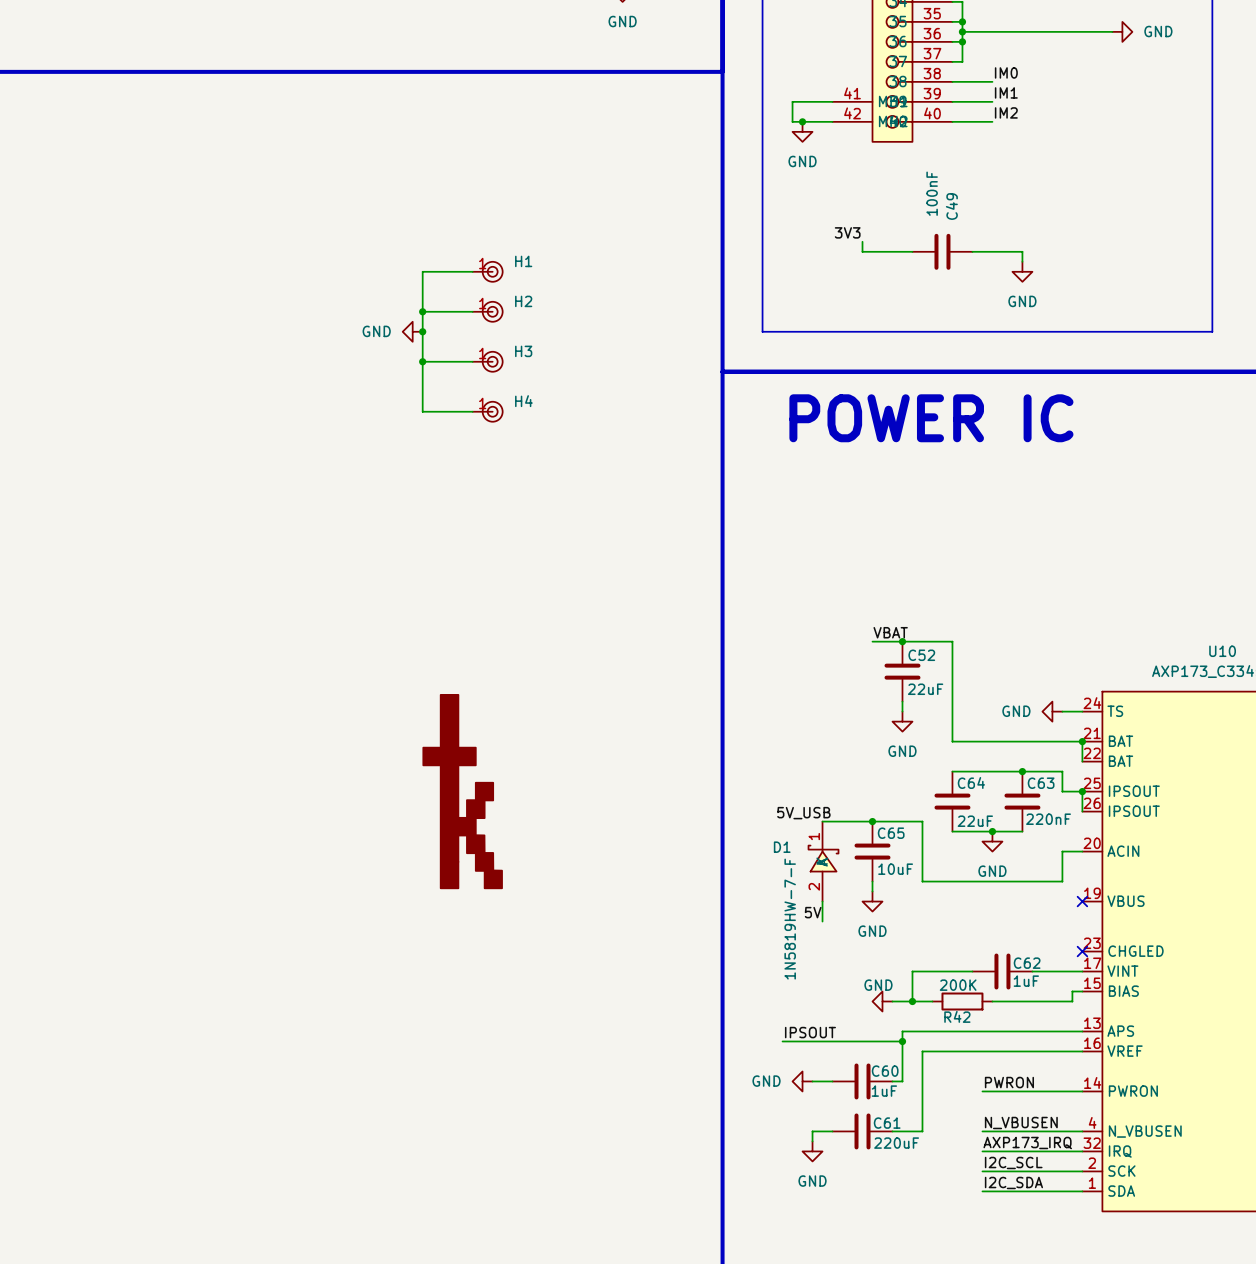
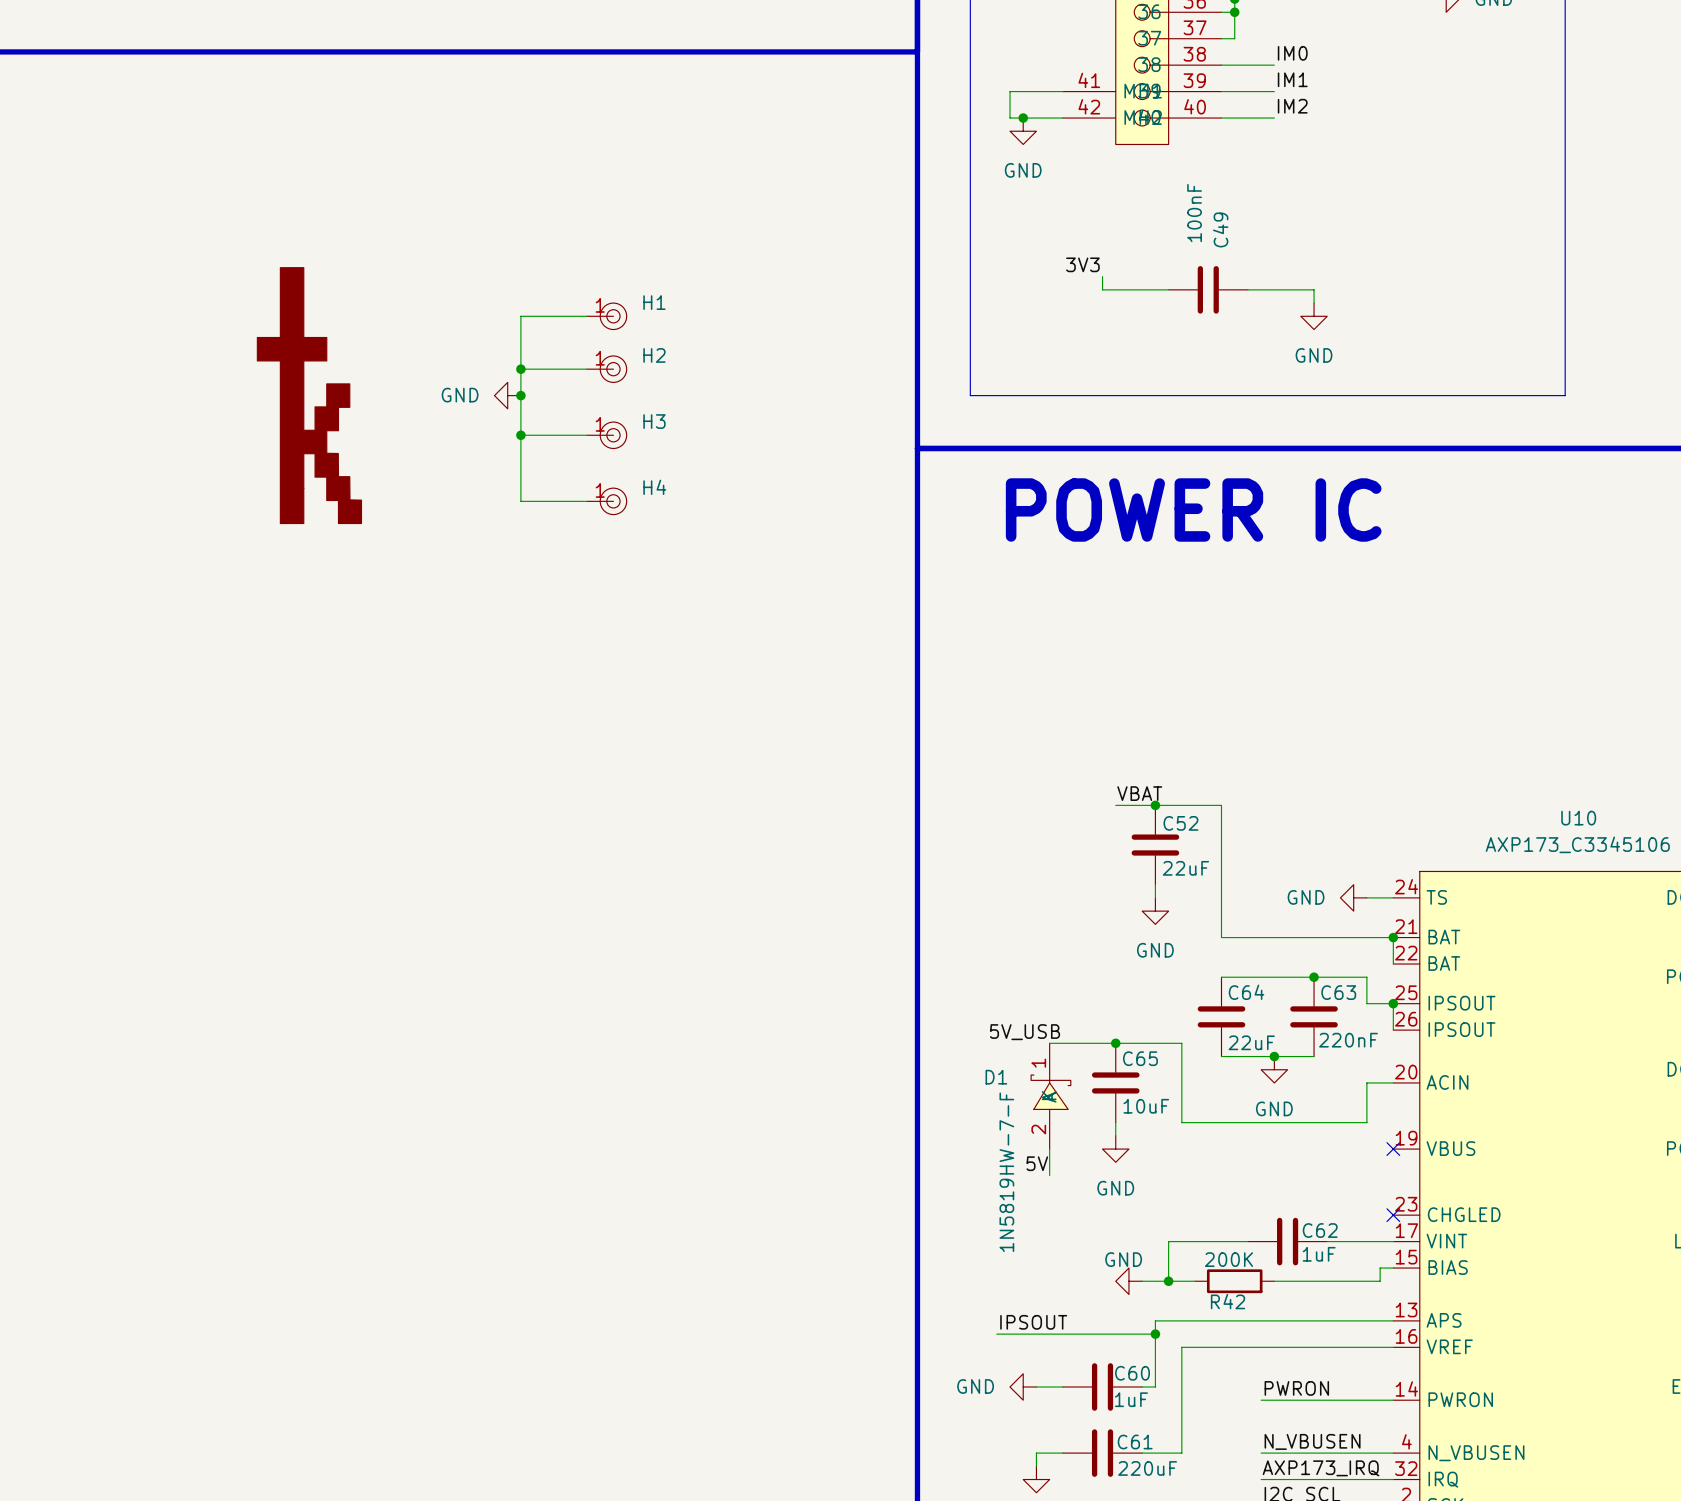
power symbol: none -> (309, 395)
power symbol: (462, 791) -> none

